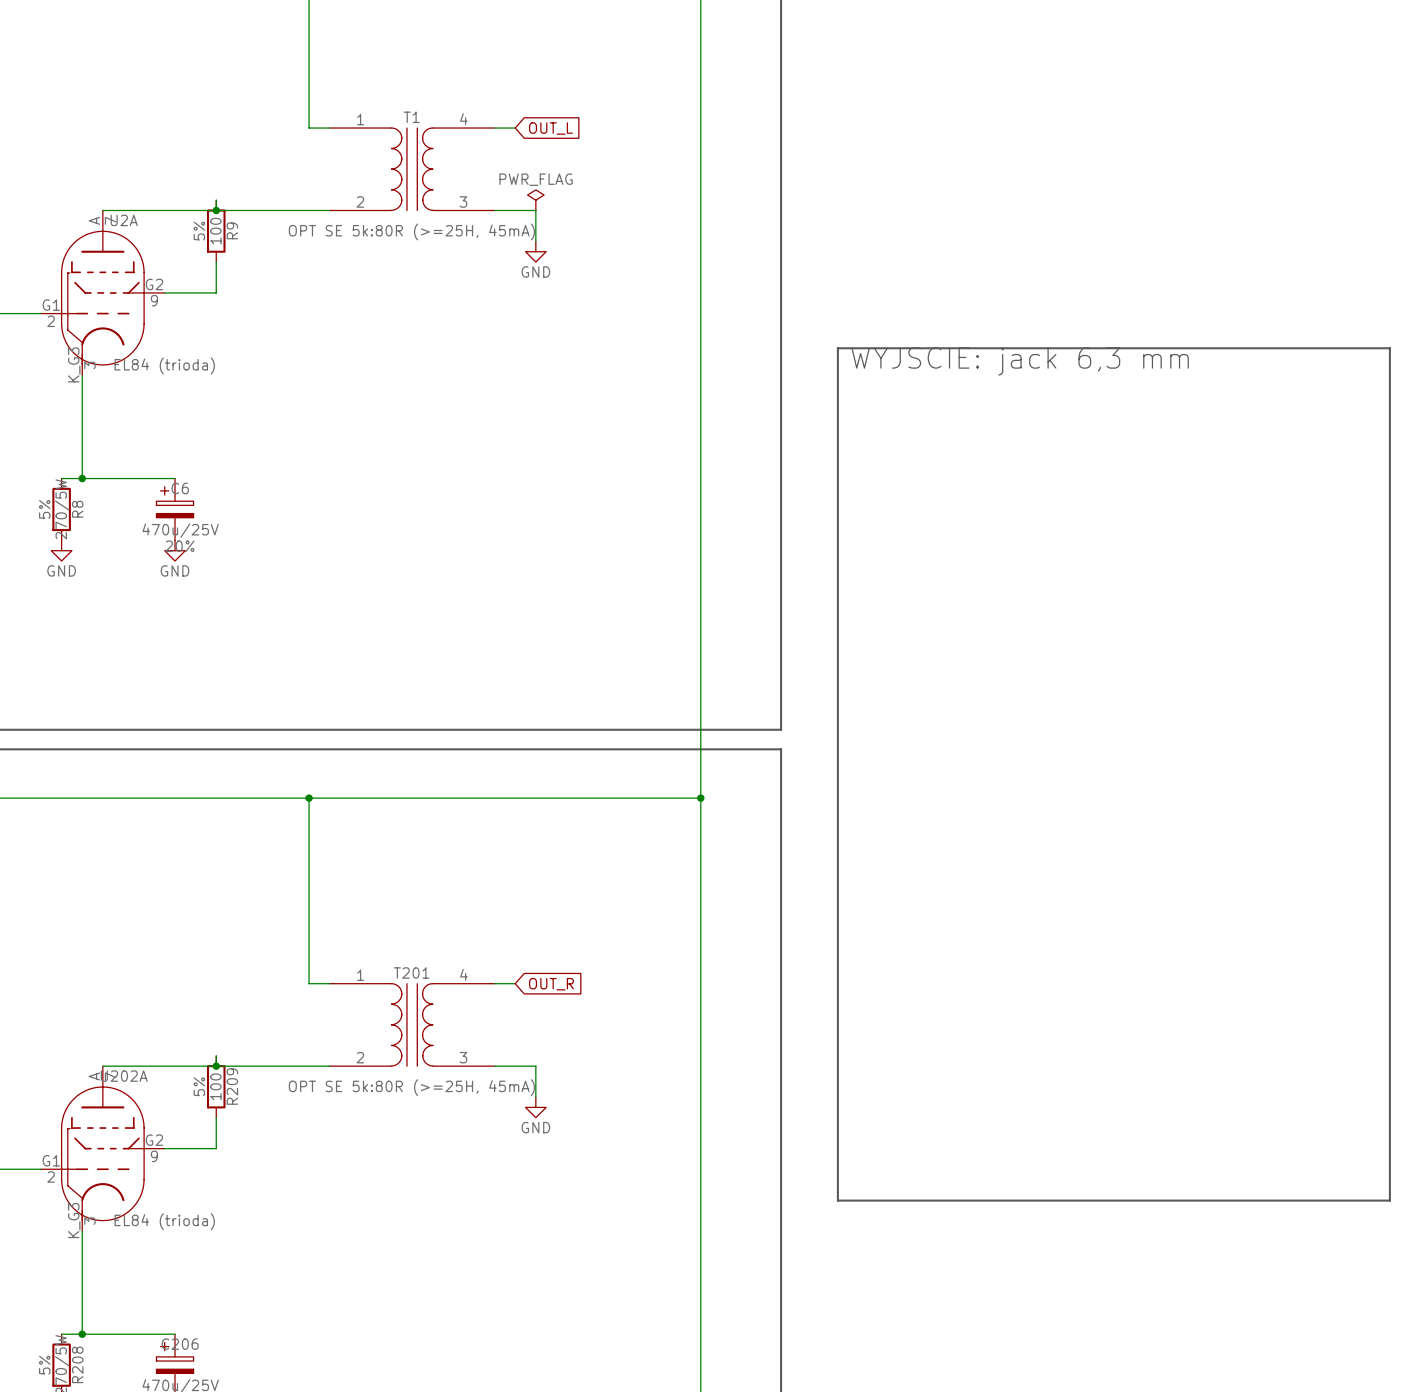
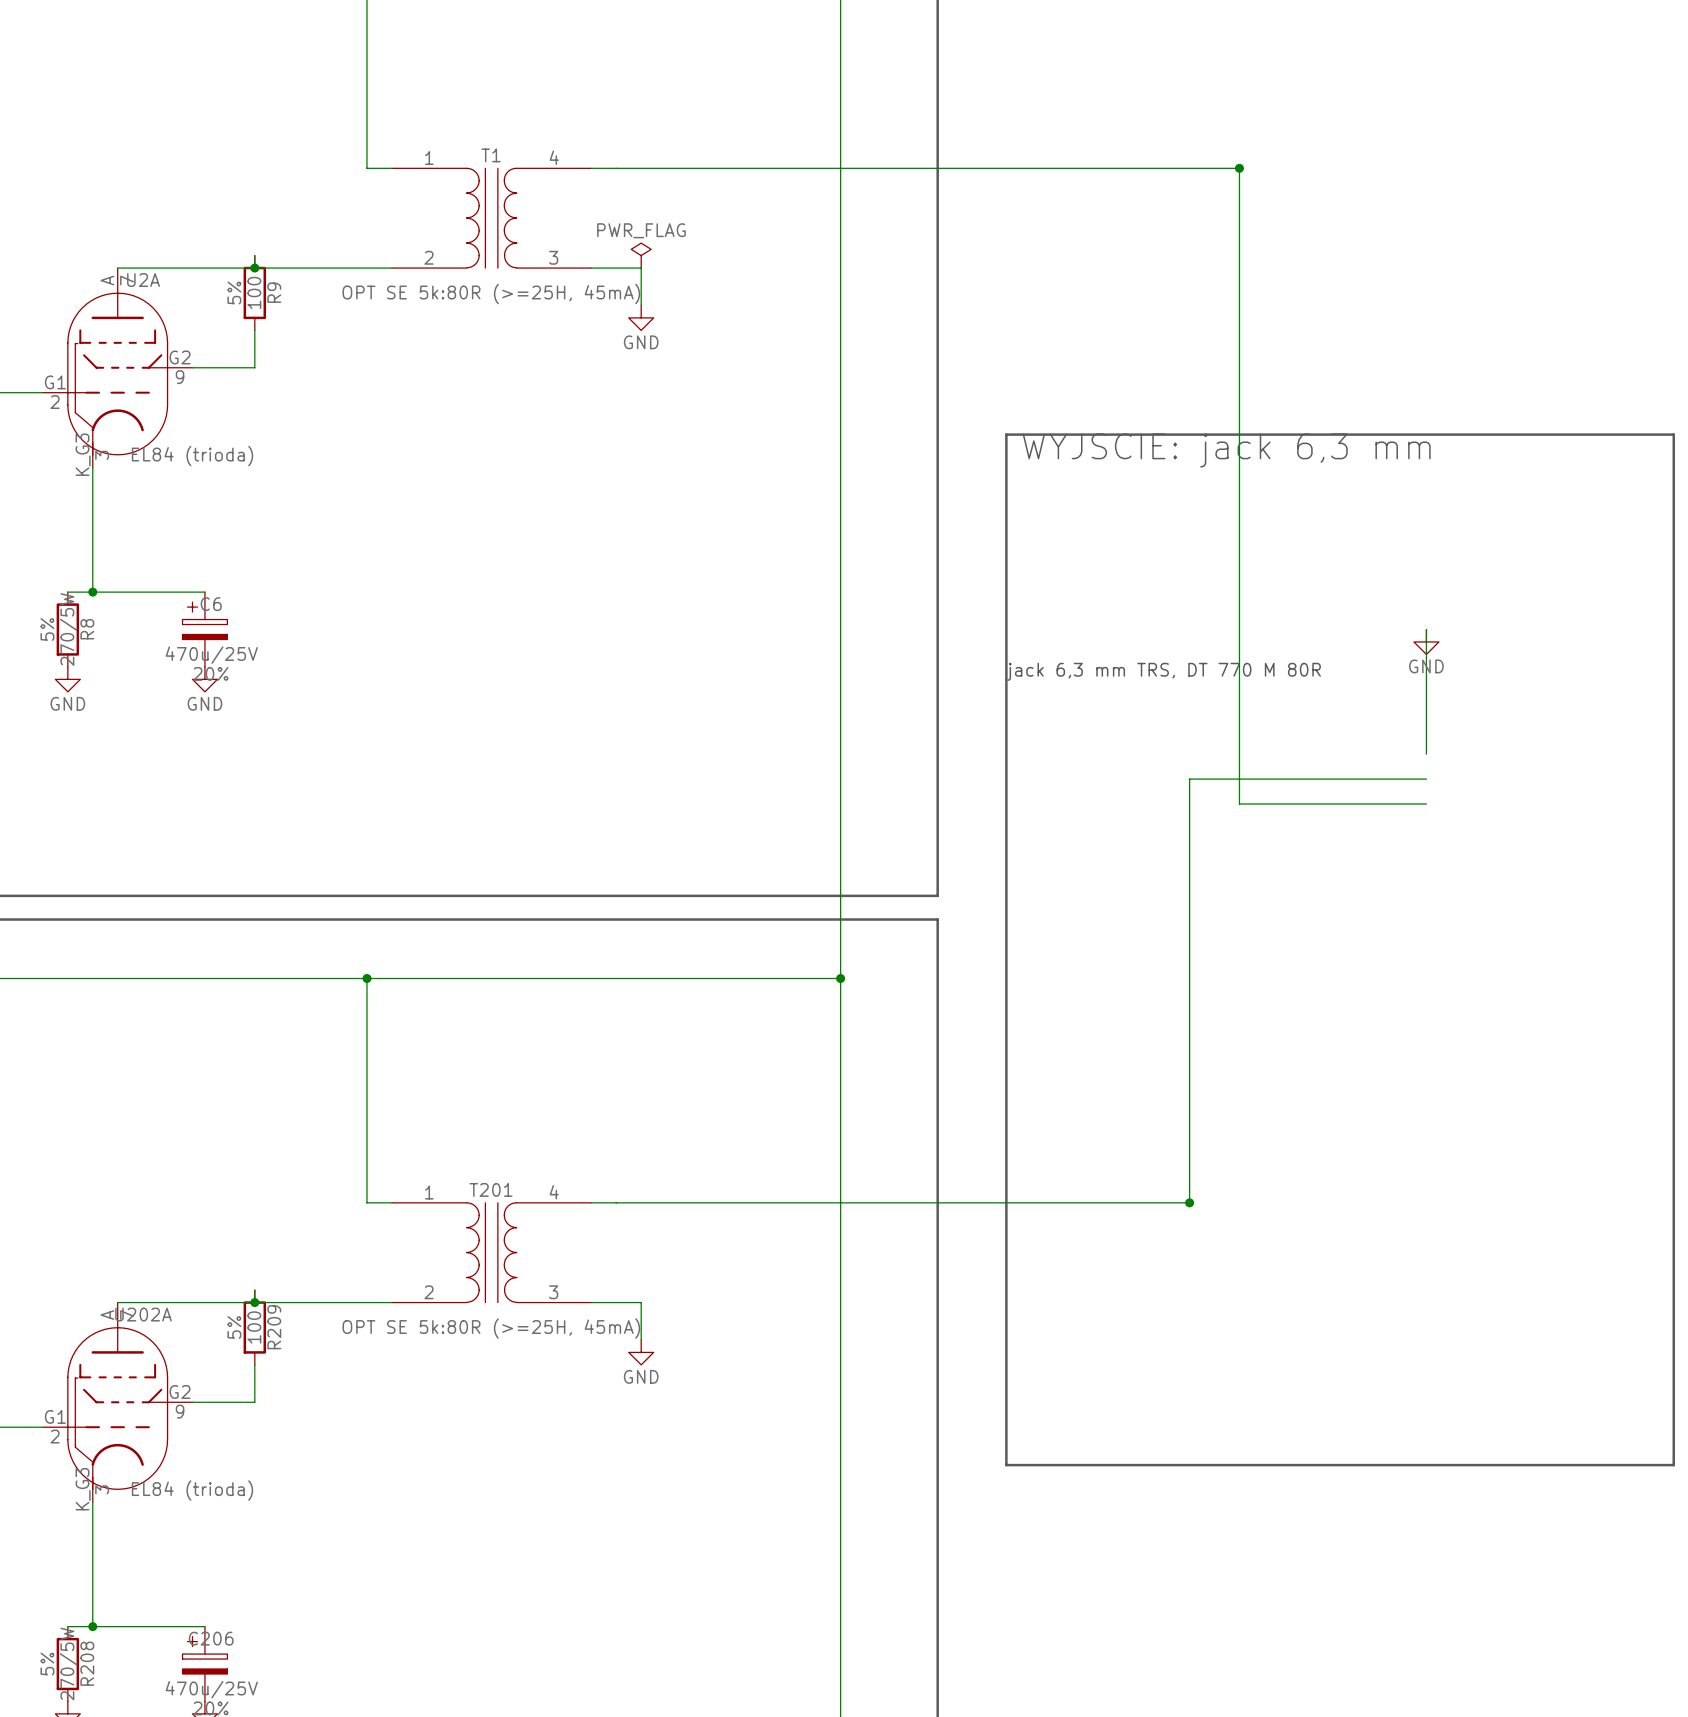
wire: none -> (616, 168) (1239, 168) (1239, 804) (1426, 804)
global label: OUT_L (550, 128) -> none
junction: none -> (1239, 168)
wire: none -> (1426, 629) (1426, 754)
power symbol: none -> GND (1426, 641)
text: none -> jack 6,3 mm TRS, DT 770 M 80R (1164, 671)
wire: none -> (1426, 779) (1189, 779) (1189, 1202) (616, 1202)
junction: none -> (1189, 1202)
global label: OUT_R (551, 984) -> none

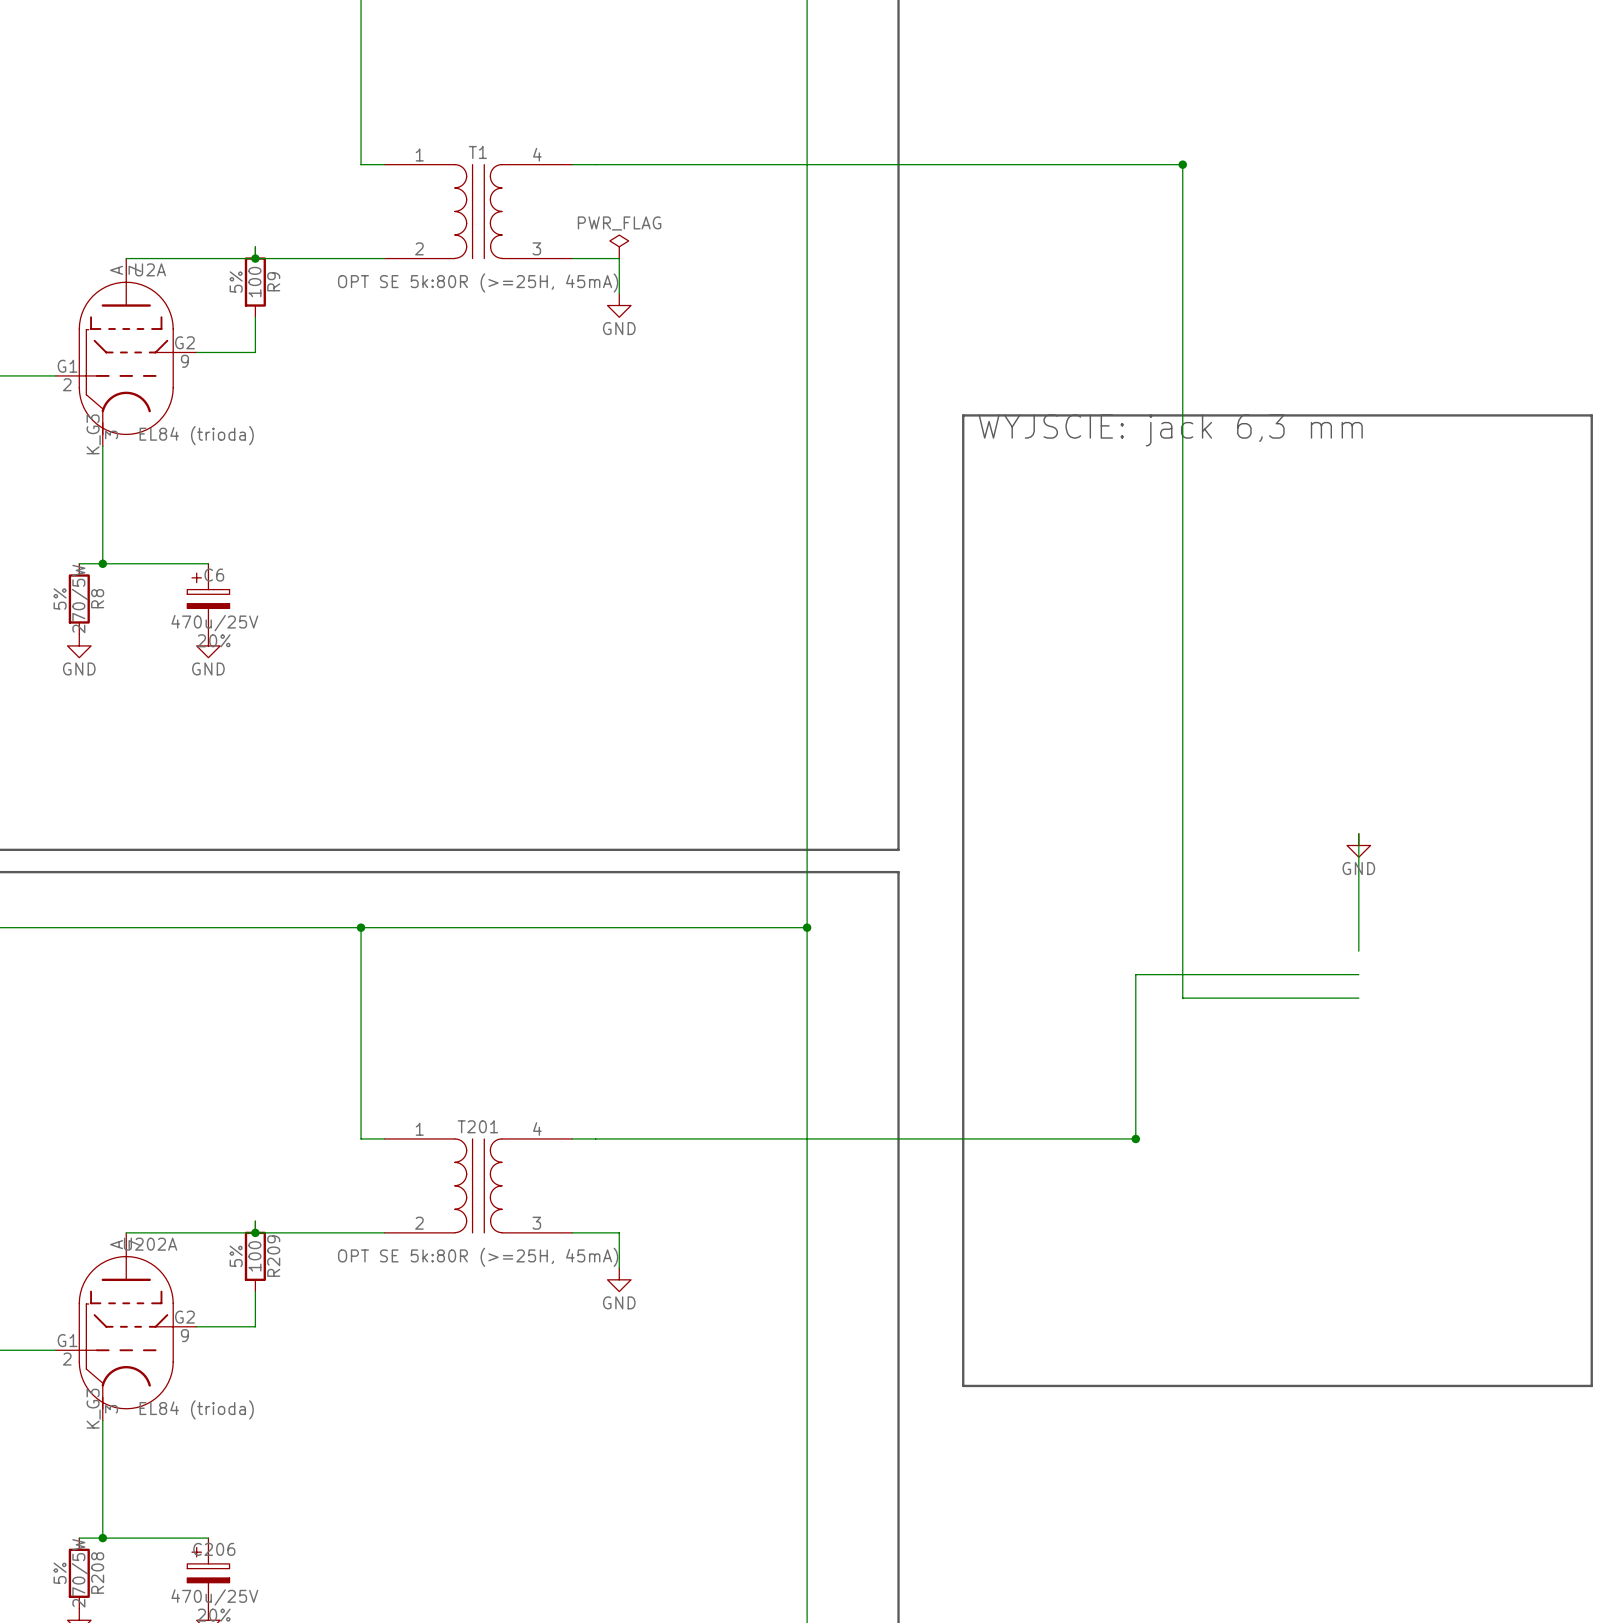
wire: (1426, 629) (1426, 754) -> none
power symbol: GND (1426, 641) -> none
text: jack 6,3 mm TRS, DT 770 M 80R (1164, 671) -> none
wire: (1426, 779) (1189, 779) (1189, 1028) -> (1358, 974) (1135, 974)
wire: (1239, 804) (1426, 804) -> (1182, 763) (1182, 998) (1358, 998)
wire: none -> (1358, 833) (1358, 951)
power symbol: none -> GND (1358, 845)

